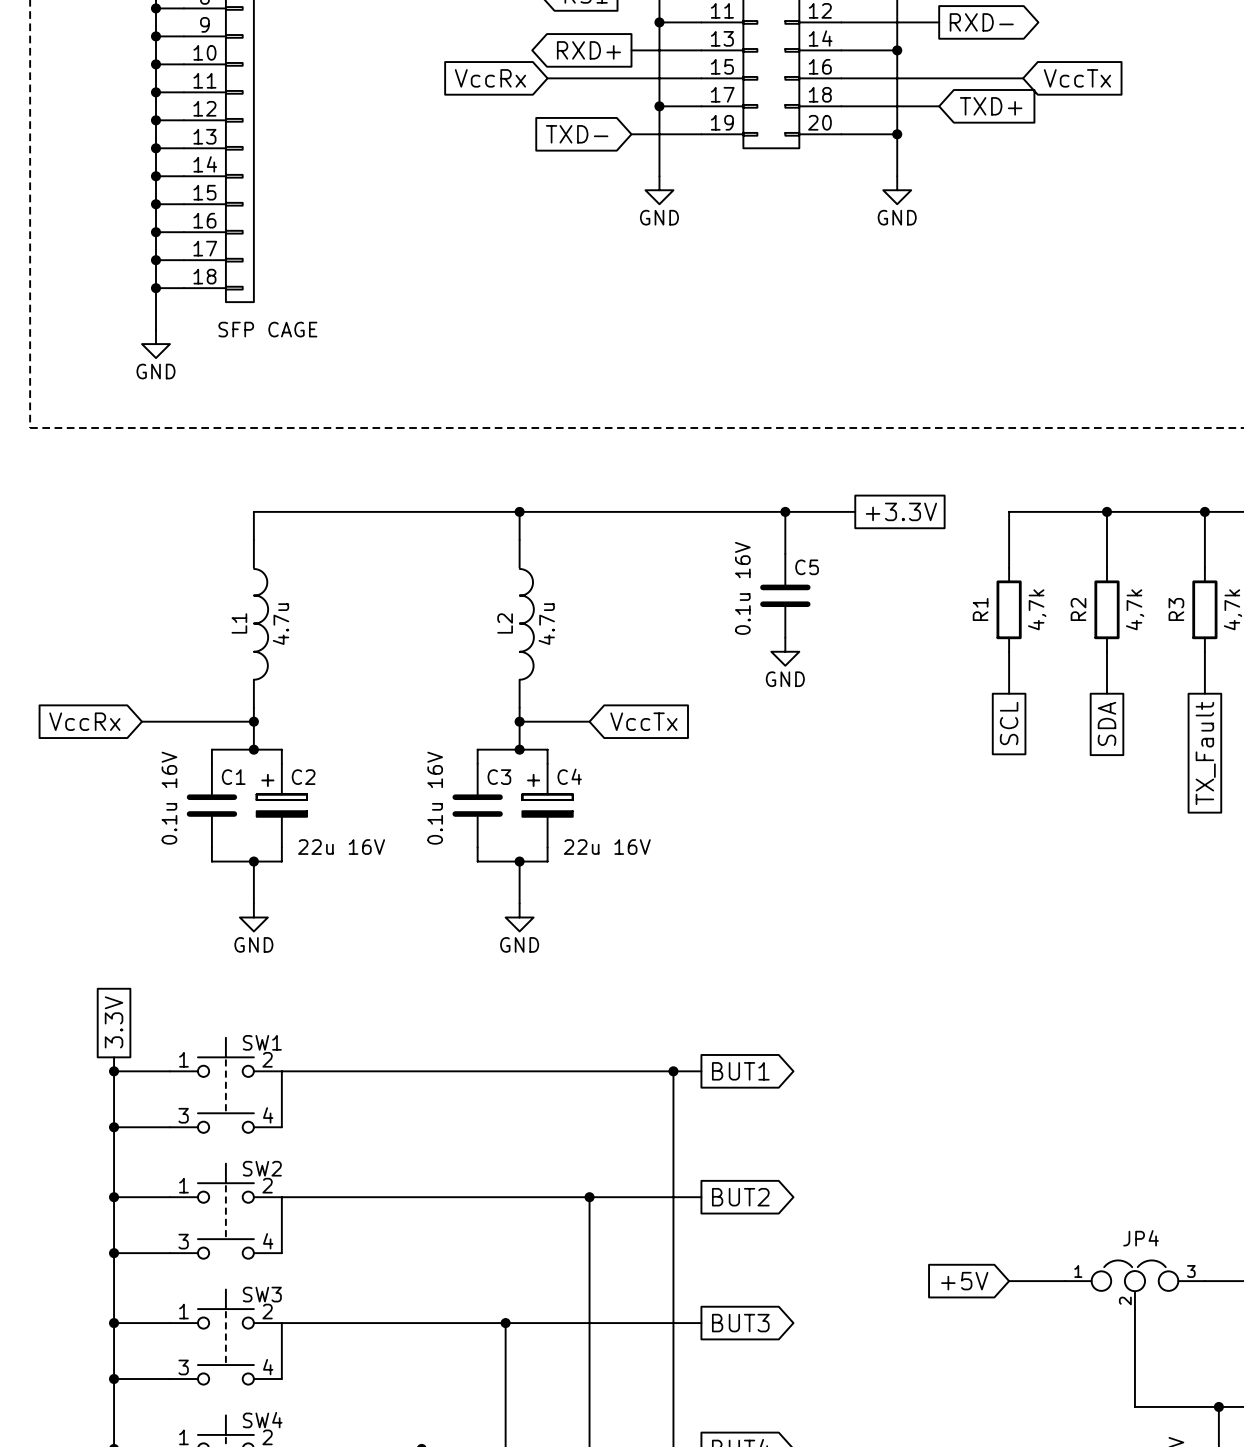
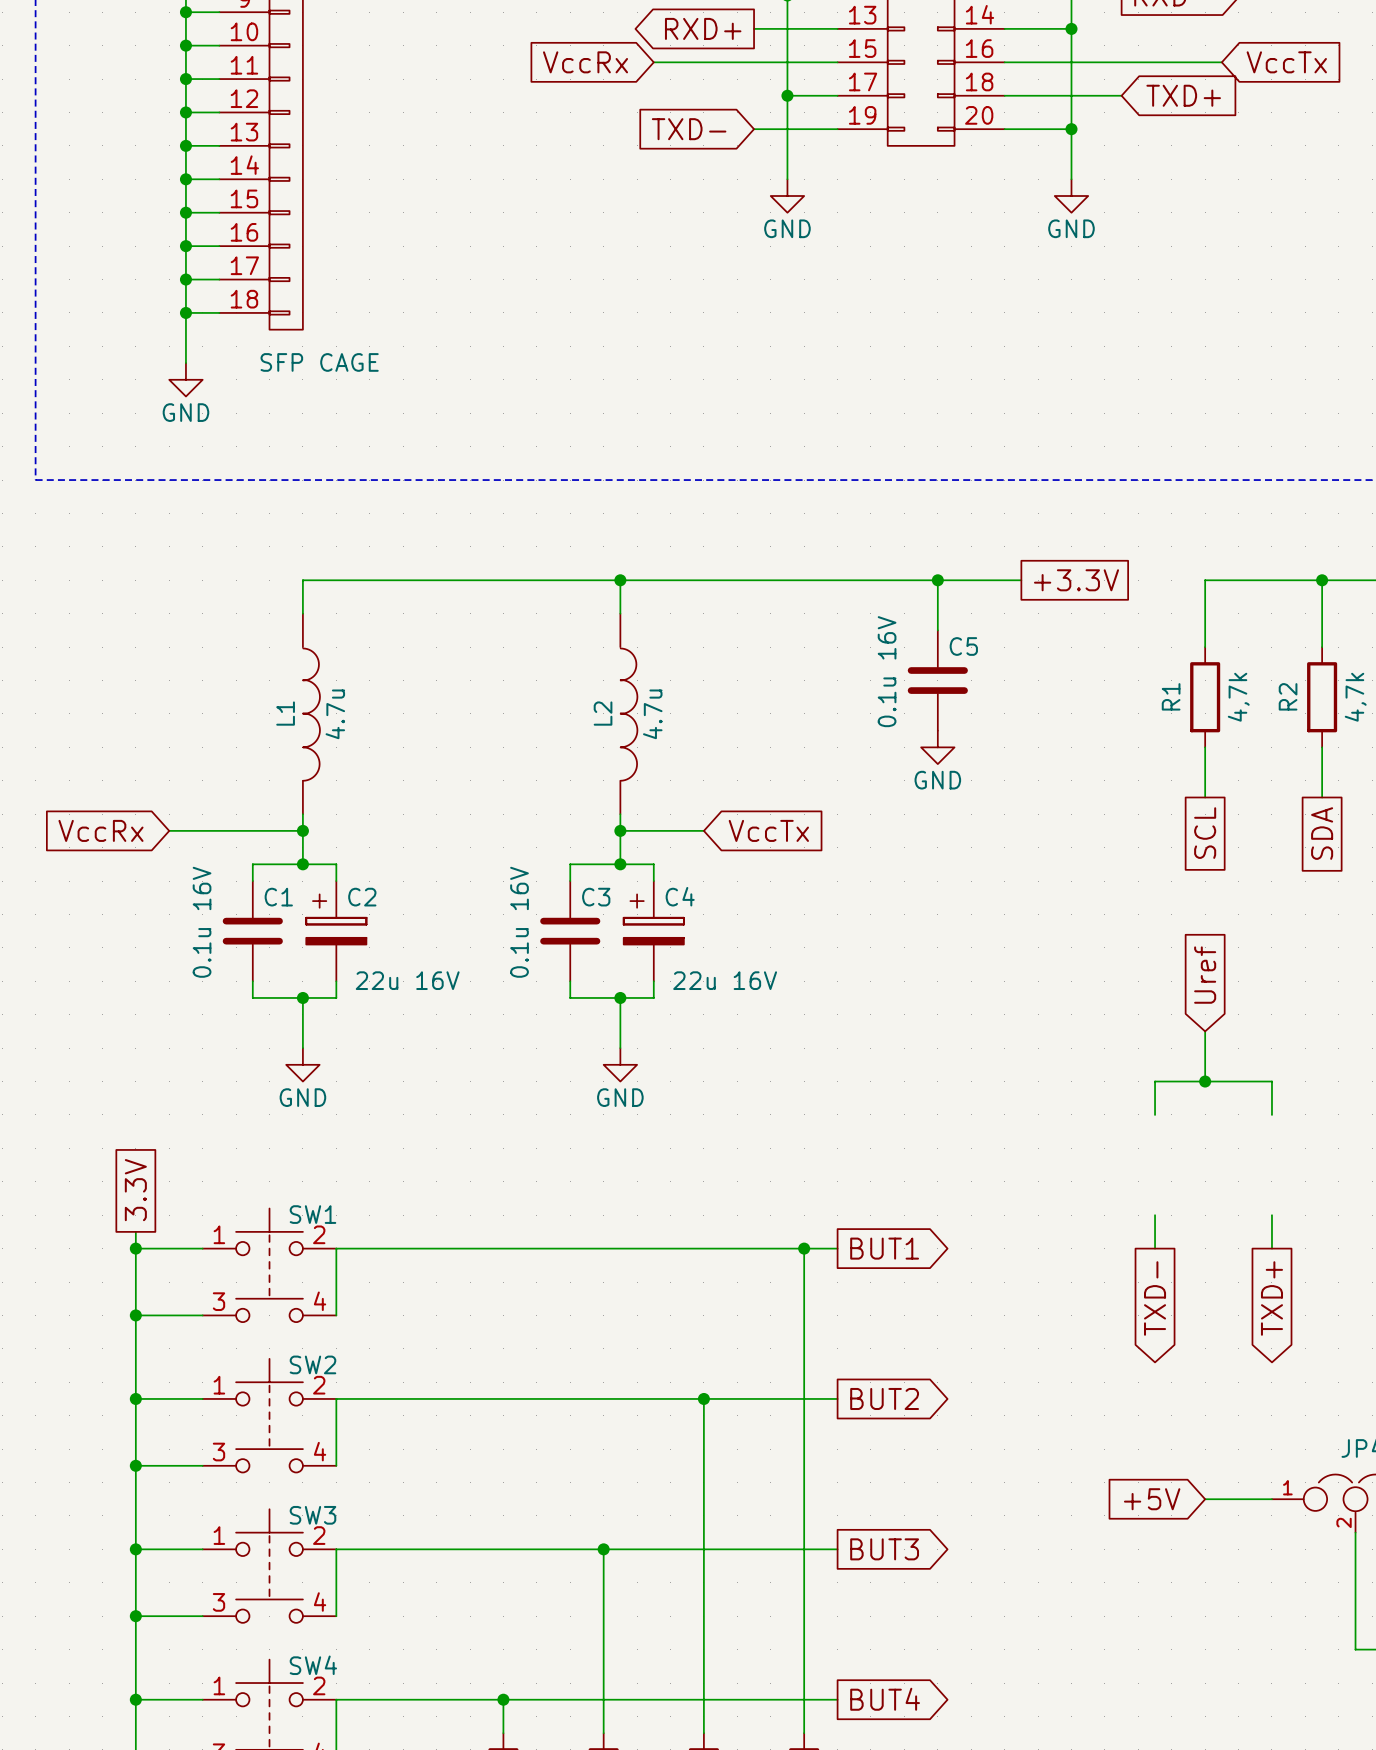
global label: none -> Uref (1205, 975)
wire: none -> (1205, 1031) (1205, 1081)
junction: none -> (1205, 1081)
wire: none -> (1155, 1114) (1155, 1081) (1271, 1081) (1271, 1114)
wire: none -> (1155, 1215) (1155, 1248)
wire: none -> (1271, 1215) (1271, 1248)
global label: none -> TXD- (1155, 1298)
global label: none -> TXD+ (1271, 1298)

